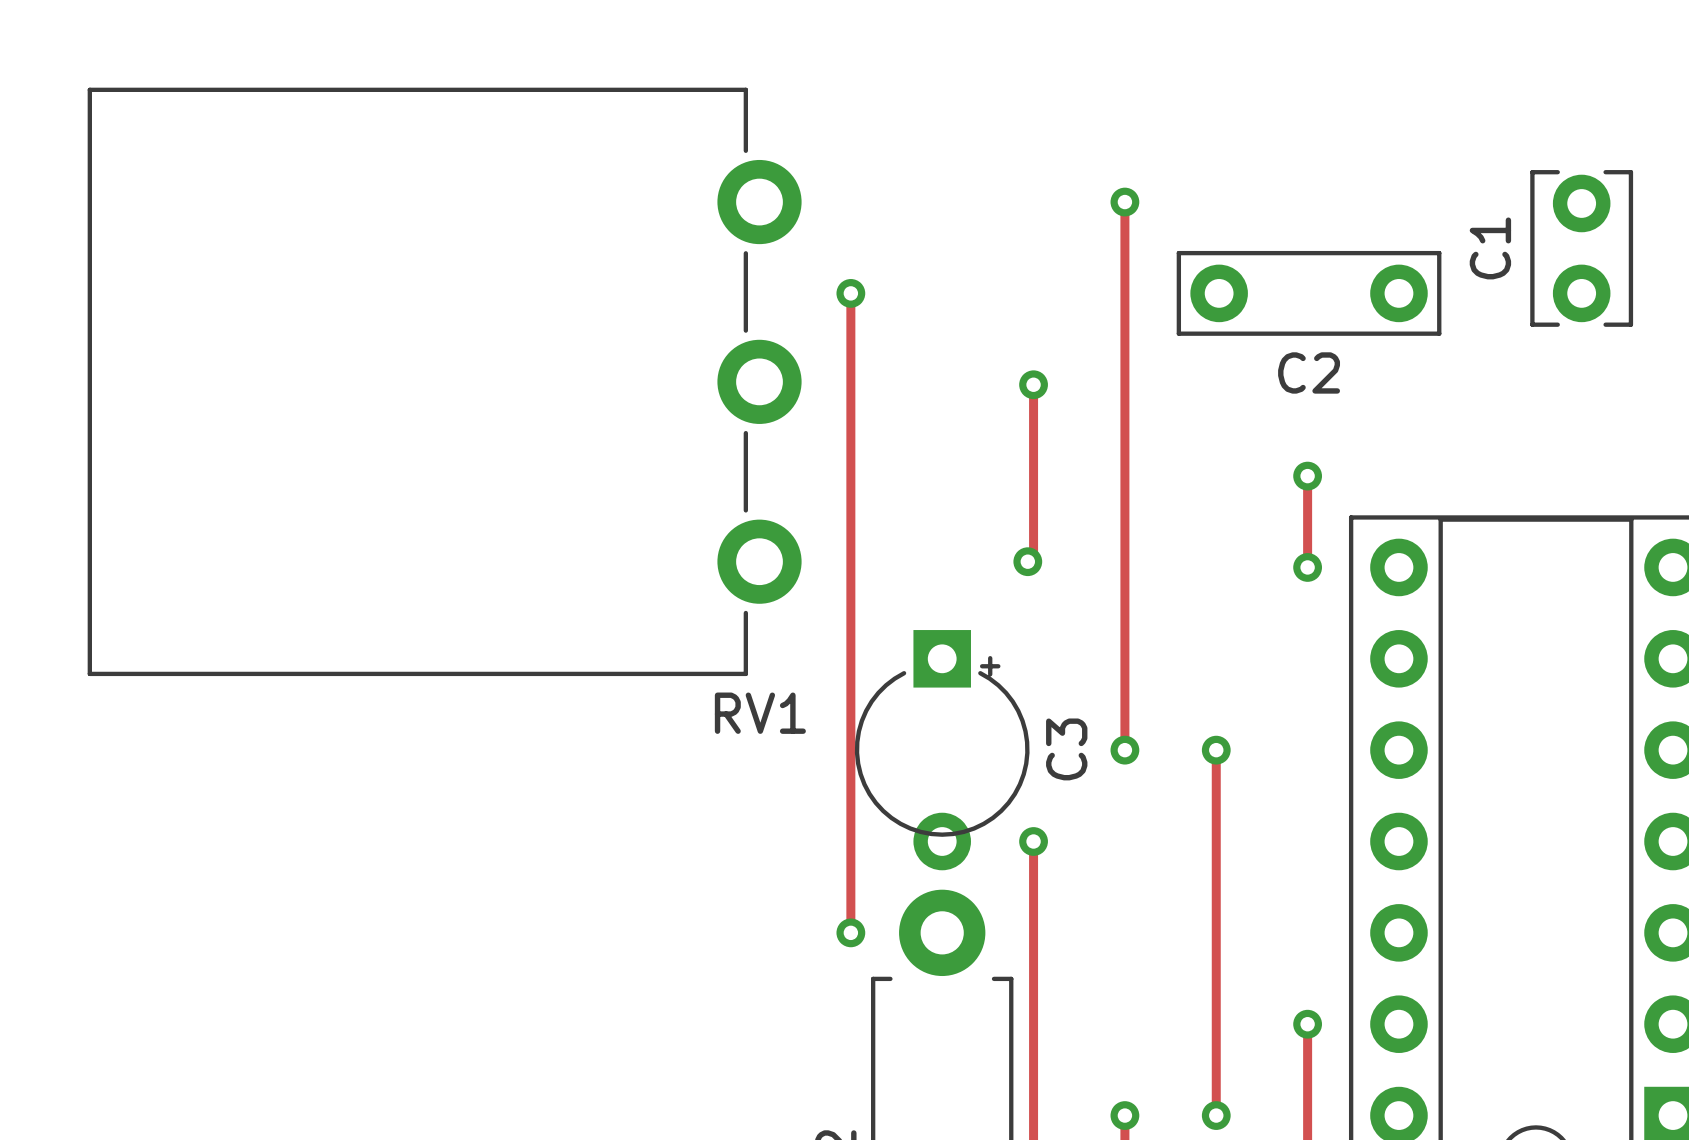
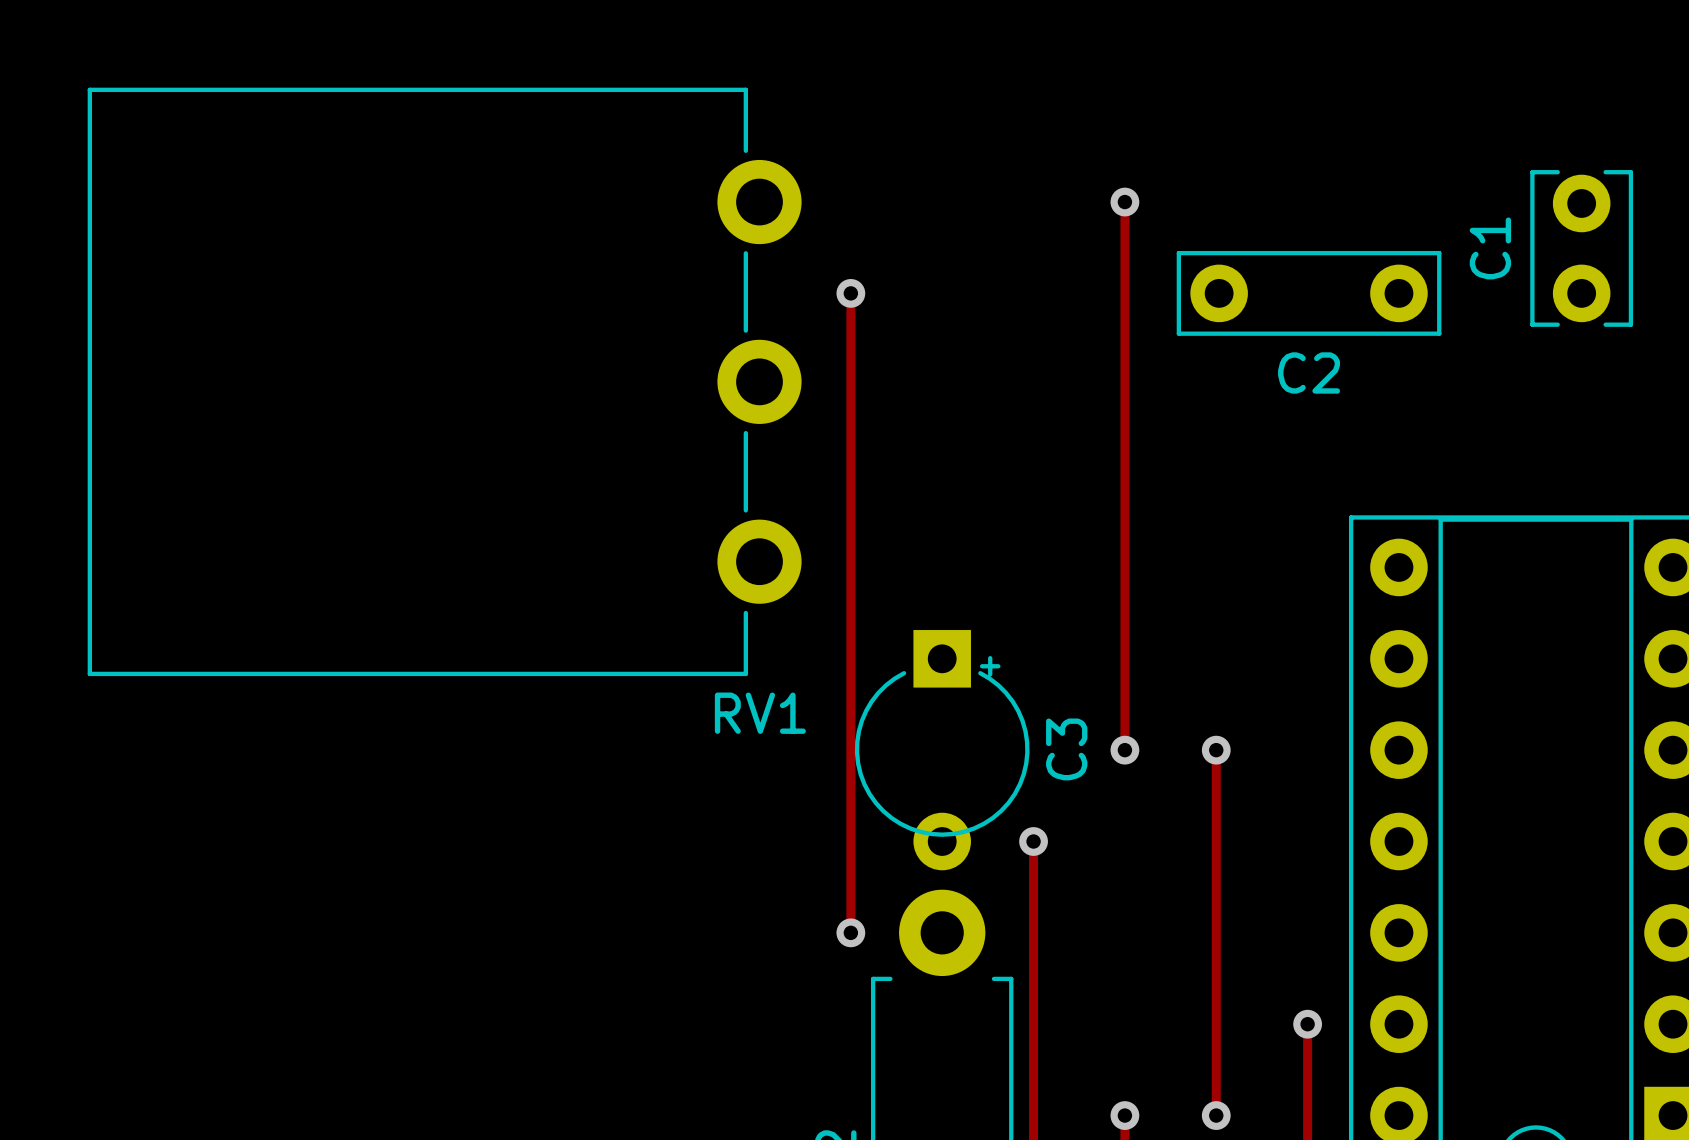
track: (1033, 384) (1033, 567) -> none
via: (1033, 384) -> none
track: (1307, 476) (1307, 567) -> none
via: (1307, 476) -> none
via: (1027, 561) -> none
via: (1307, 567) -> none

